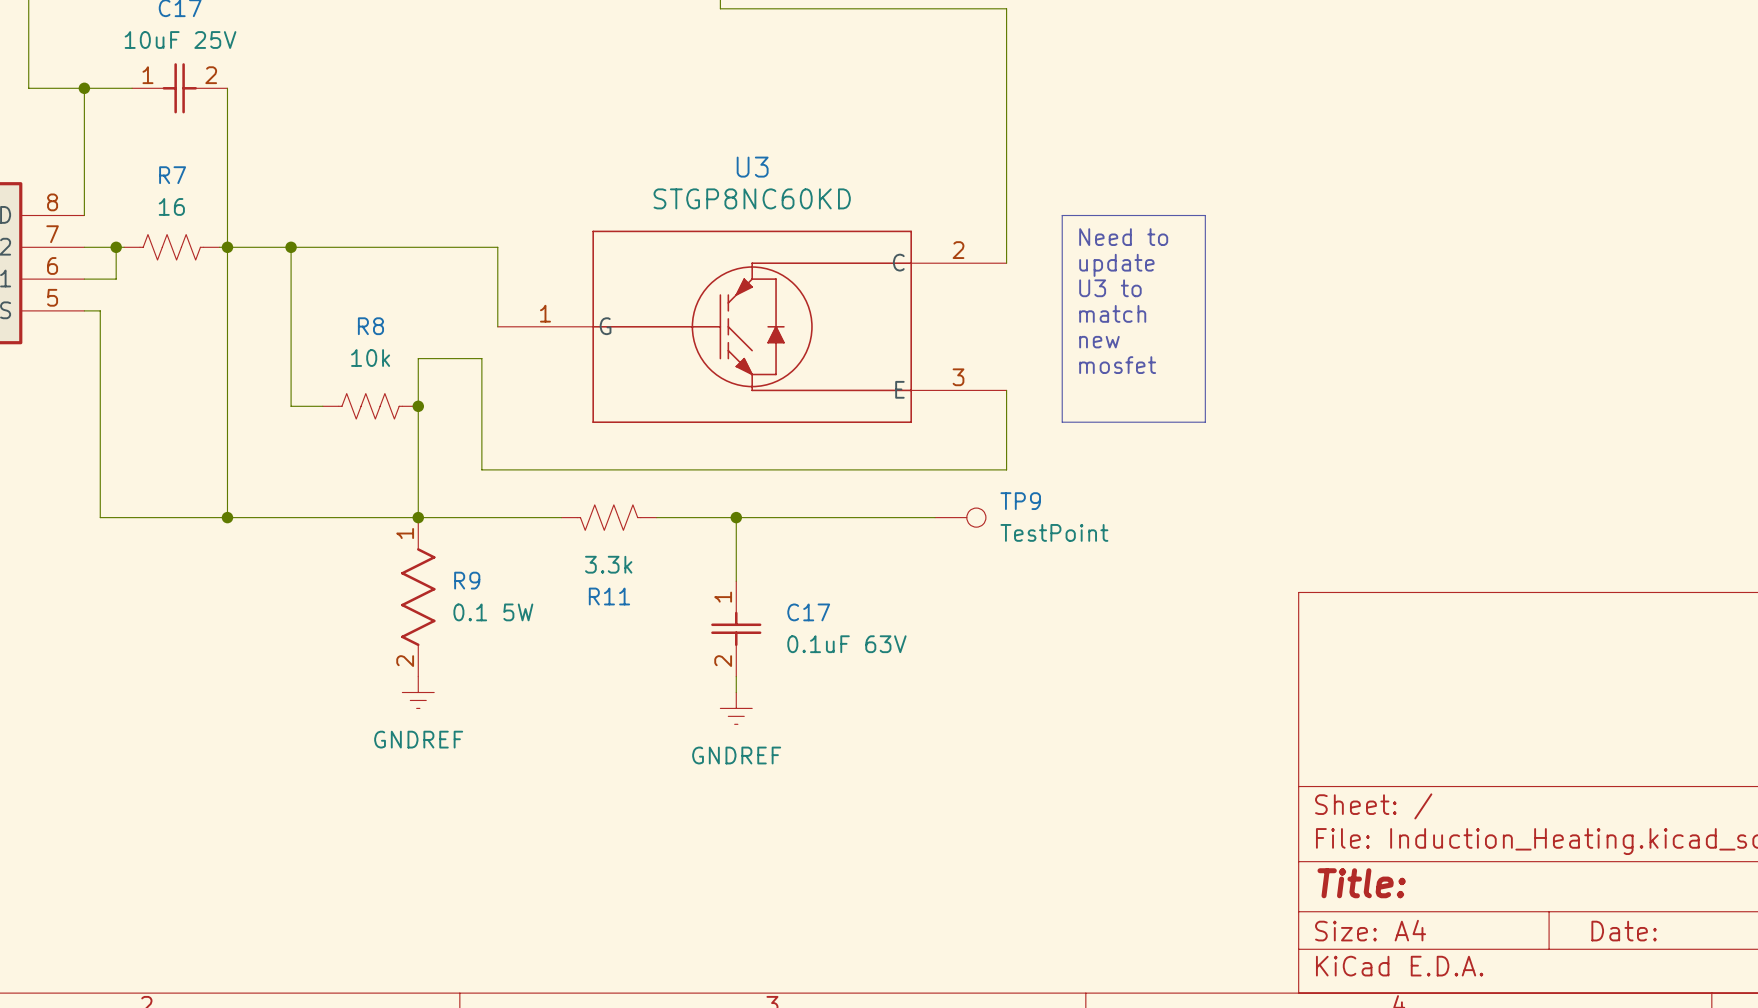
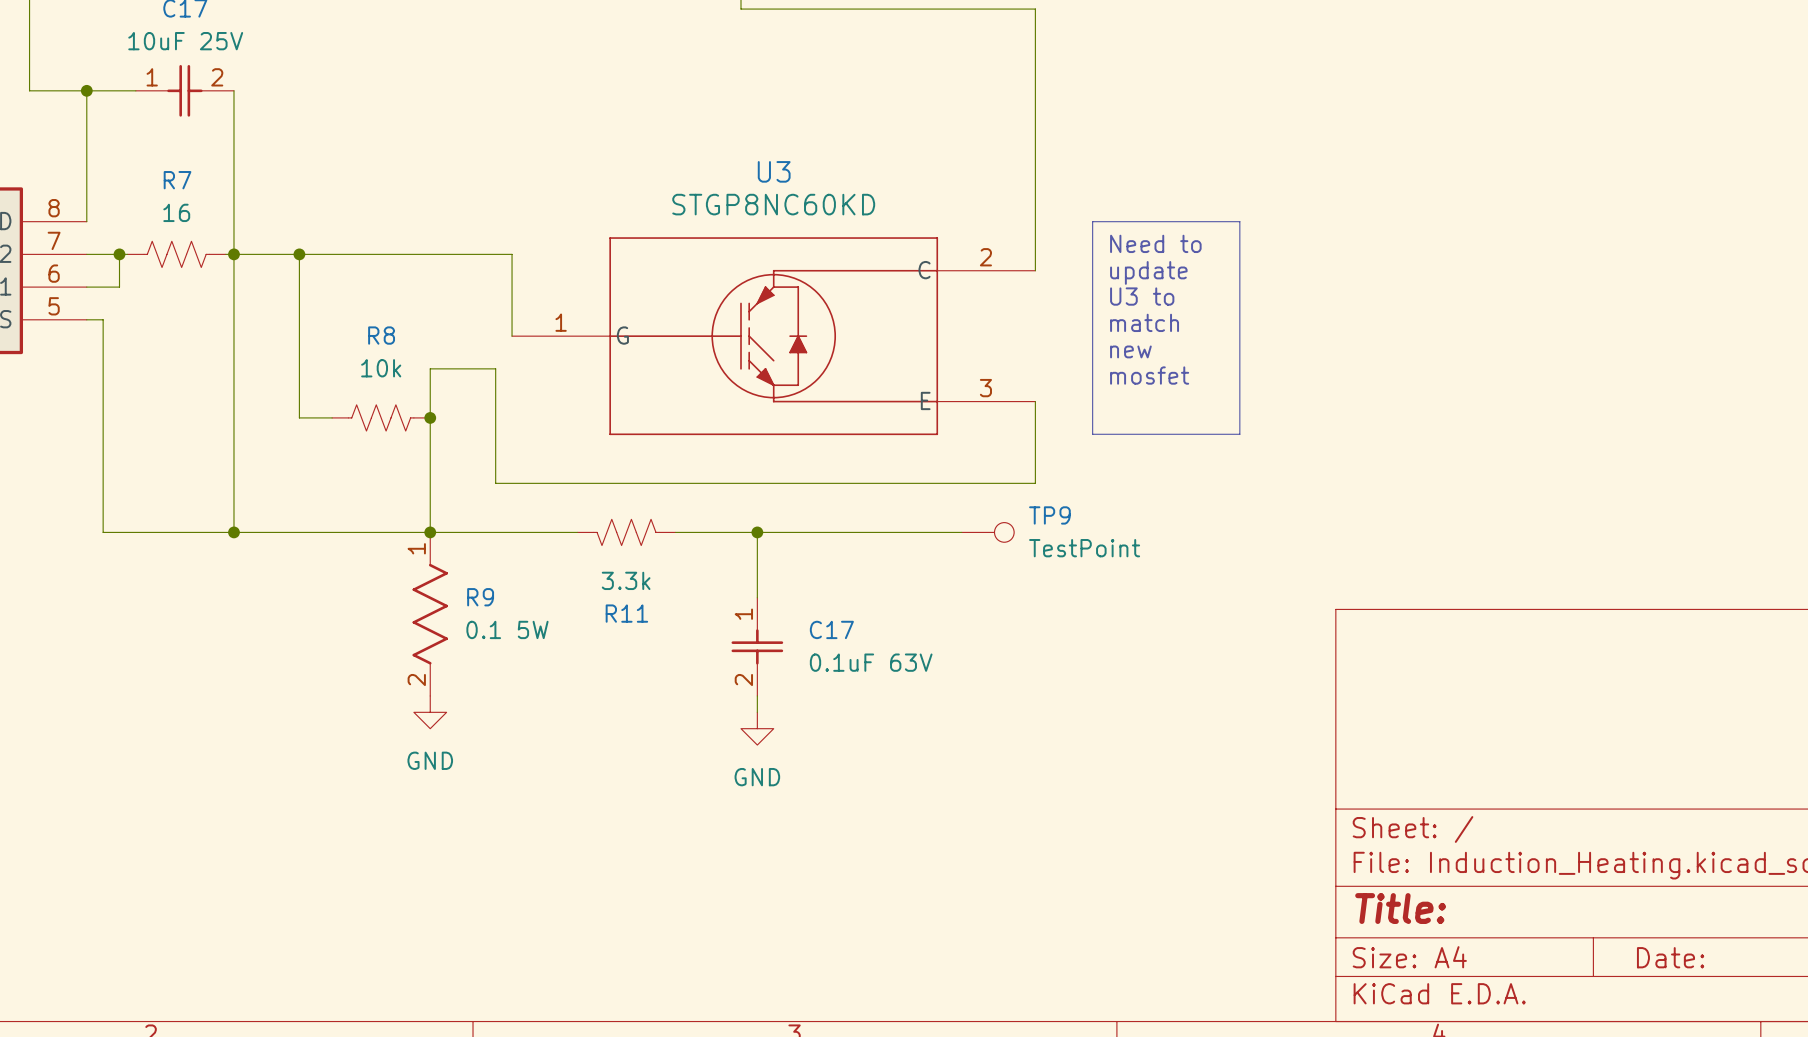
power symbol: GNDREF (418, 692) -> GND (430, 712)
power symbol: GNDREF (736, 708) -> GND (757, 728)

